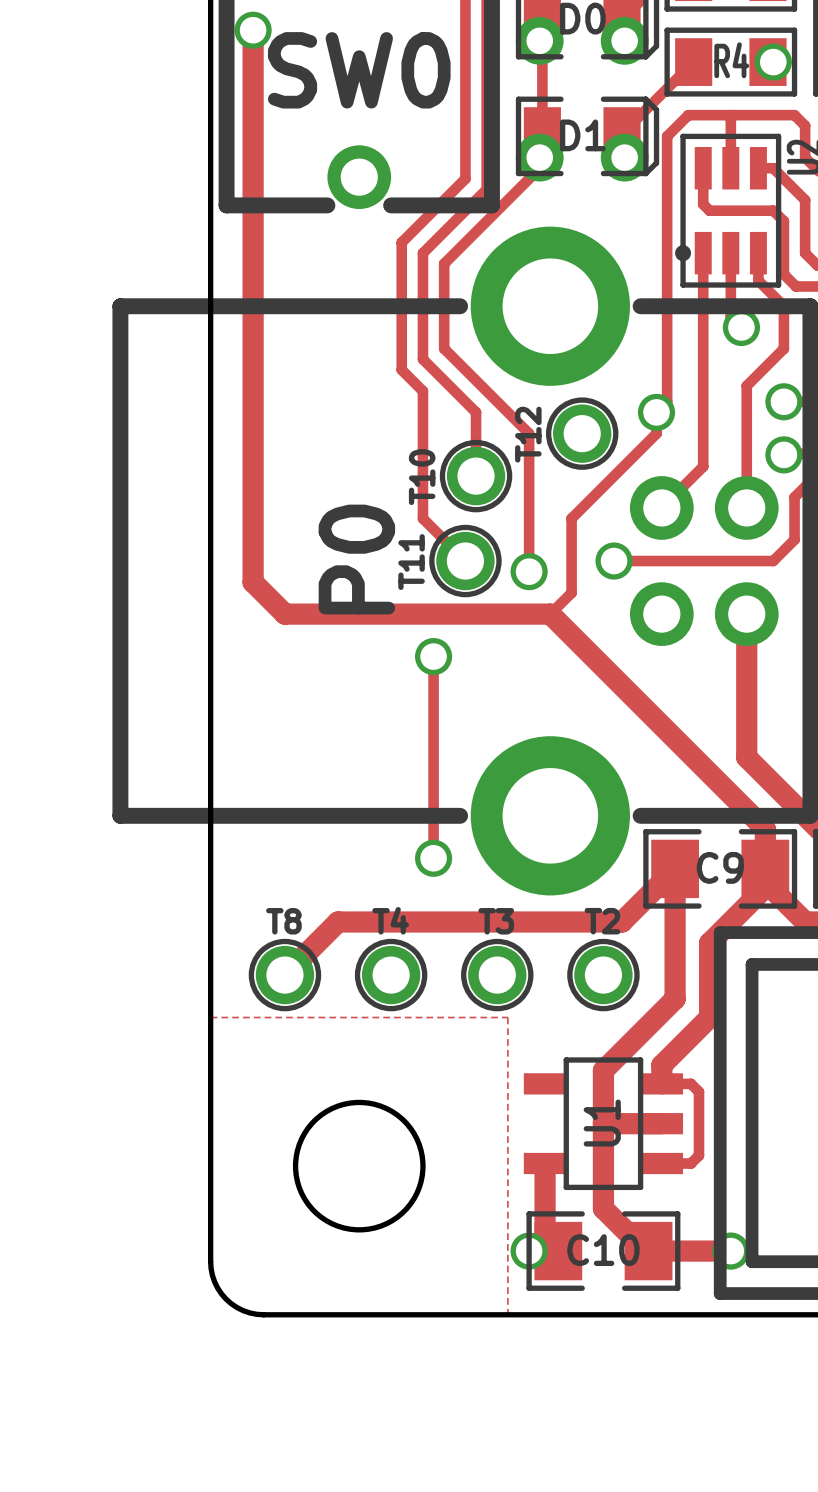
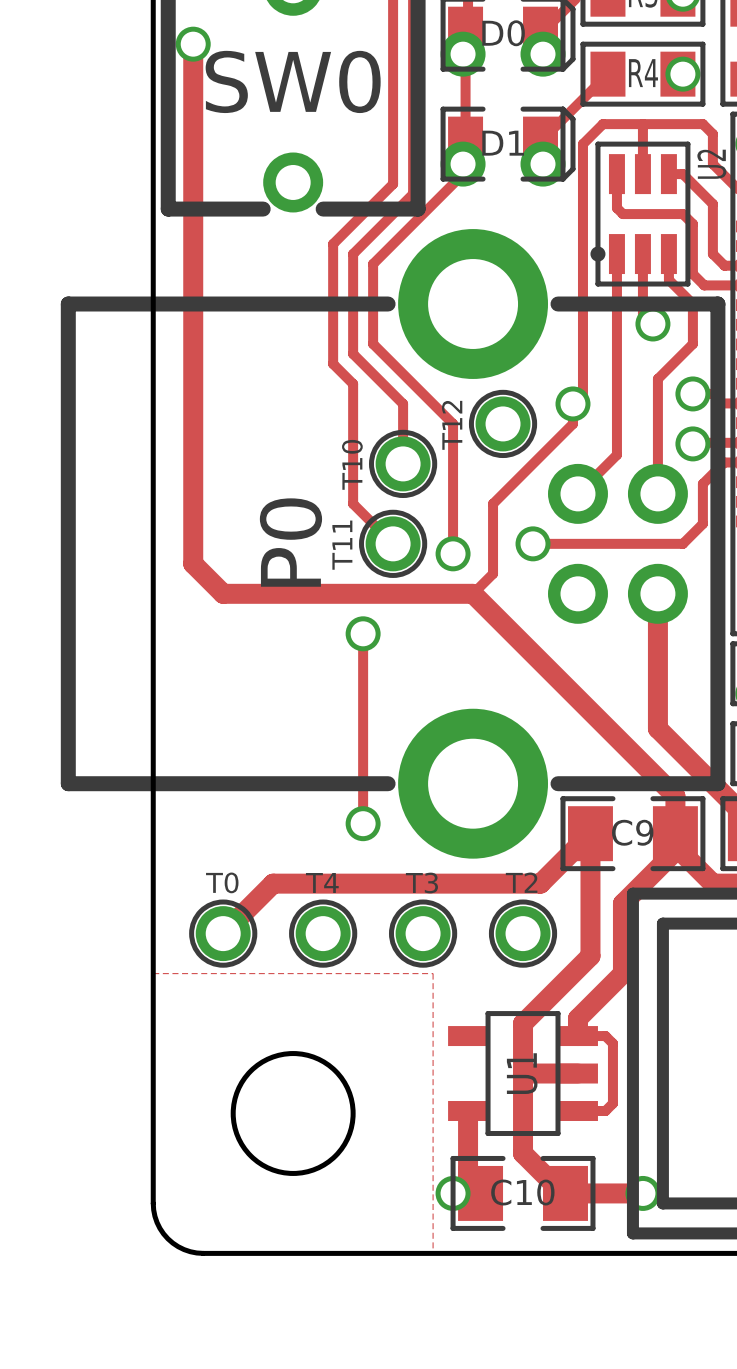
T8 name: T8 (283, 921) -> T0 (222, 882)

